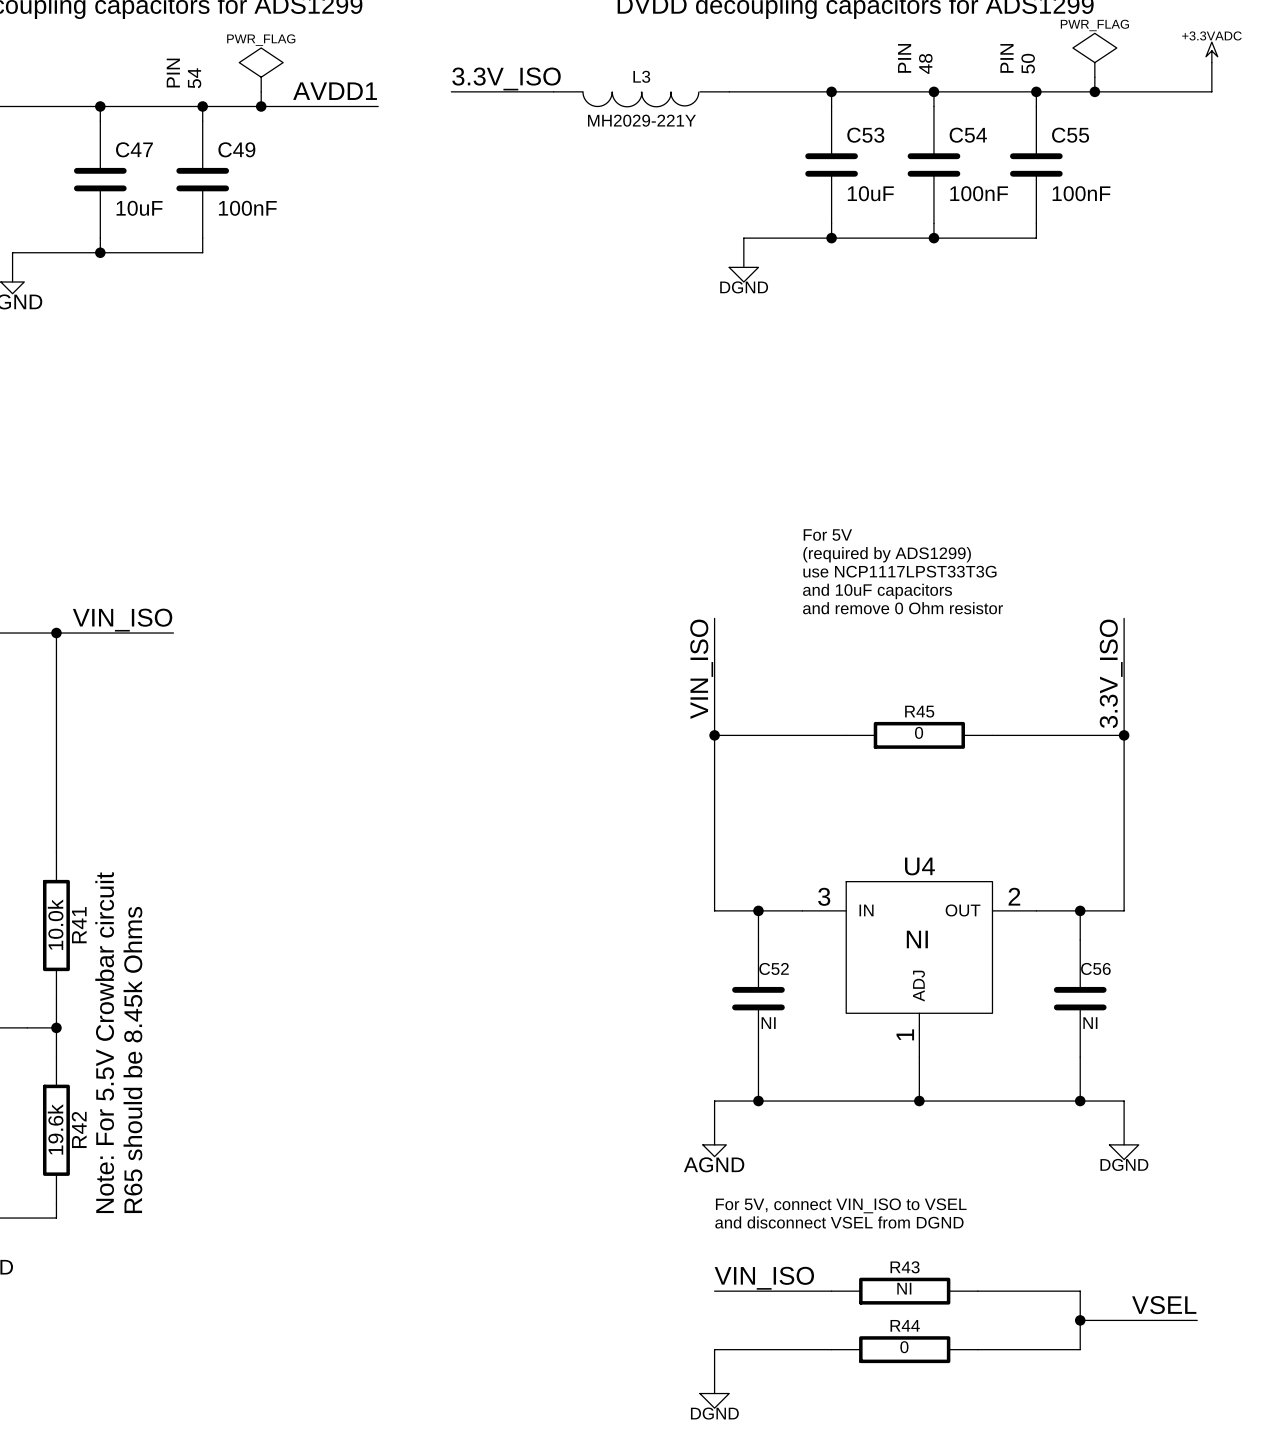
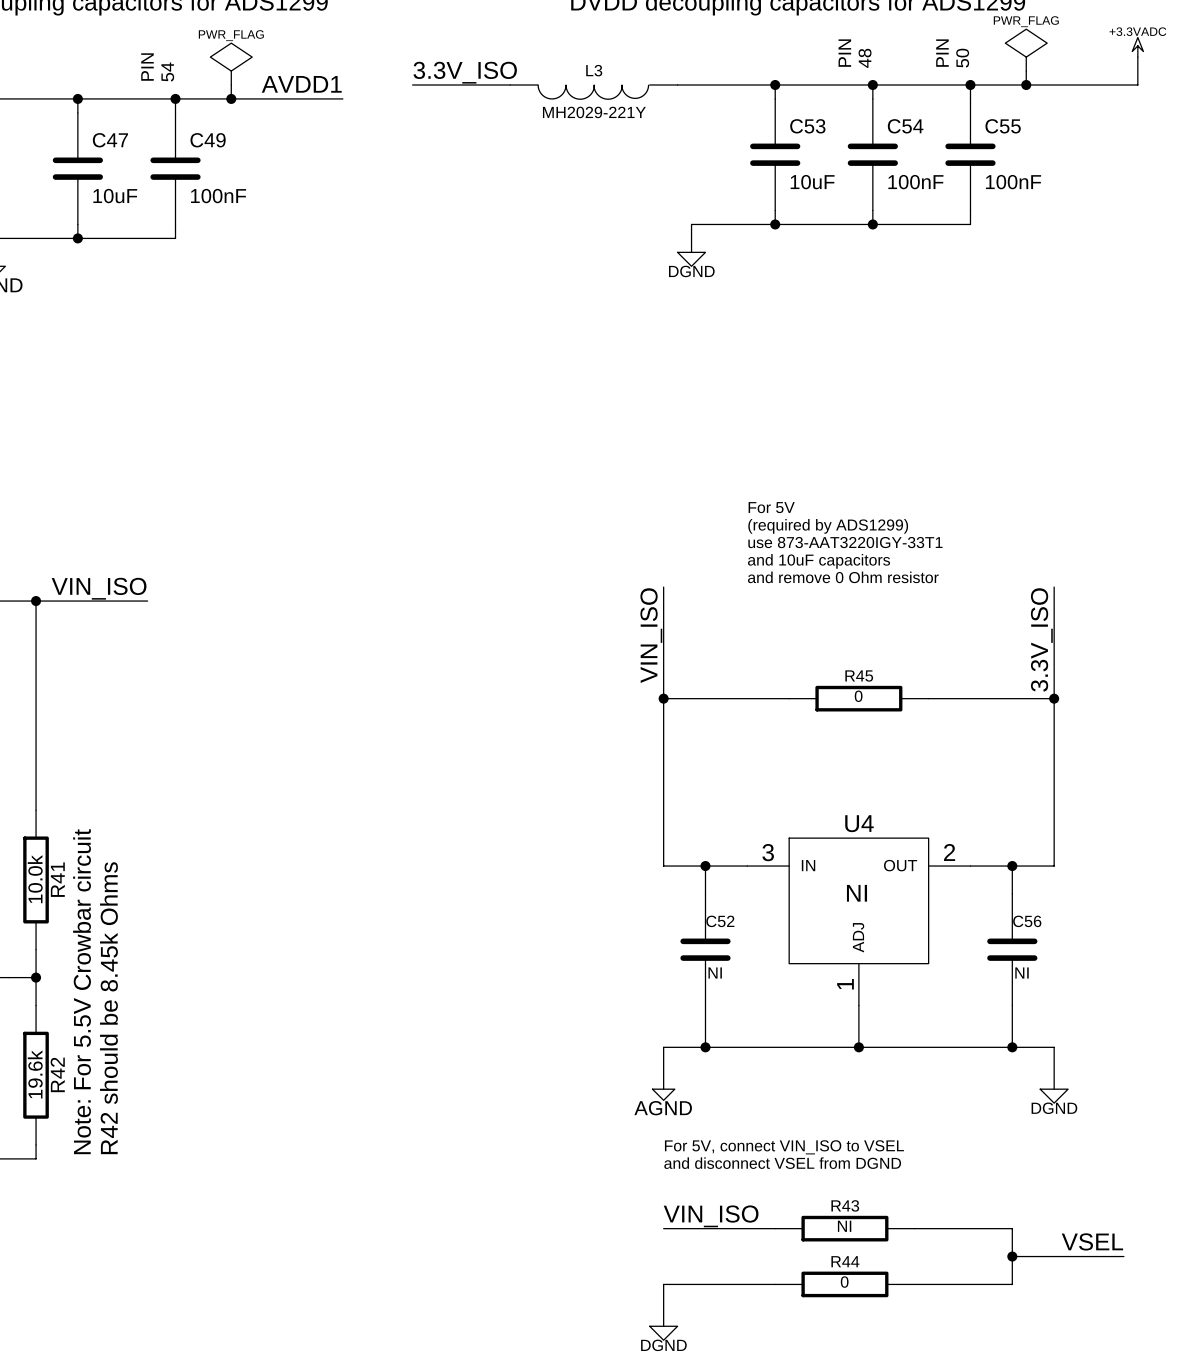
text: use NCP1117LPST33T3G (899, 571) -> use 873-AAT3220IGY-33T1 (845, 542)
text: R65 should be 8.45k Ohms (132, 1059) -> R42 should be 8.45k Ohms (108, 1008)

